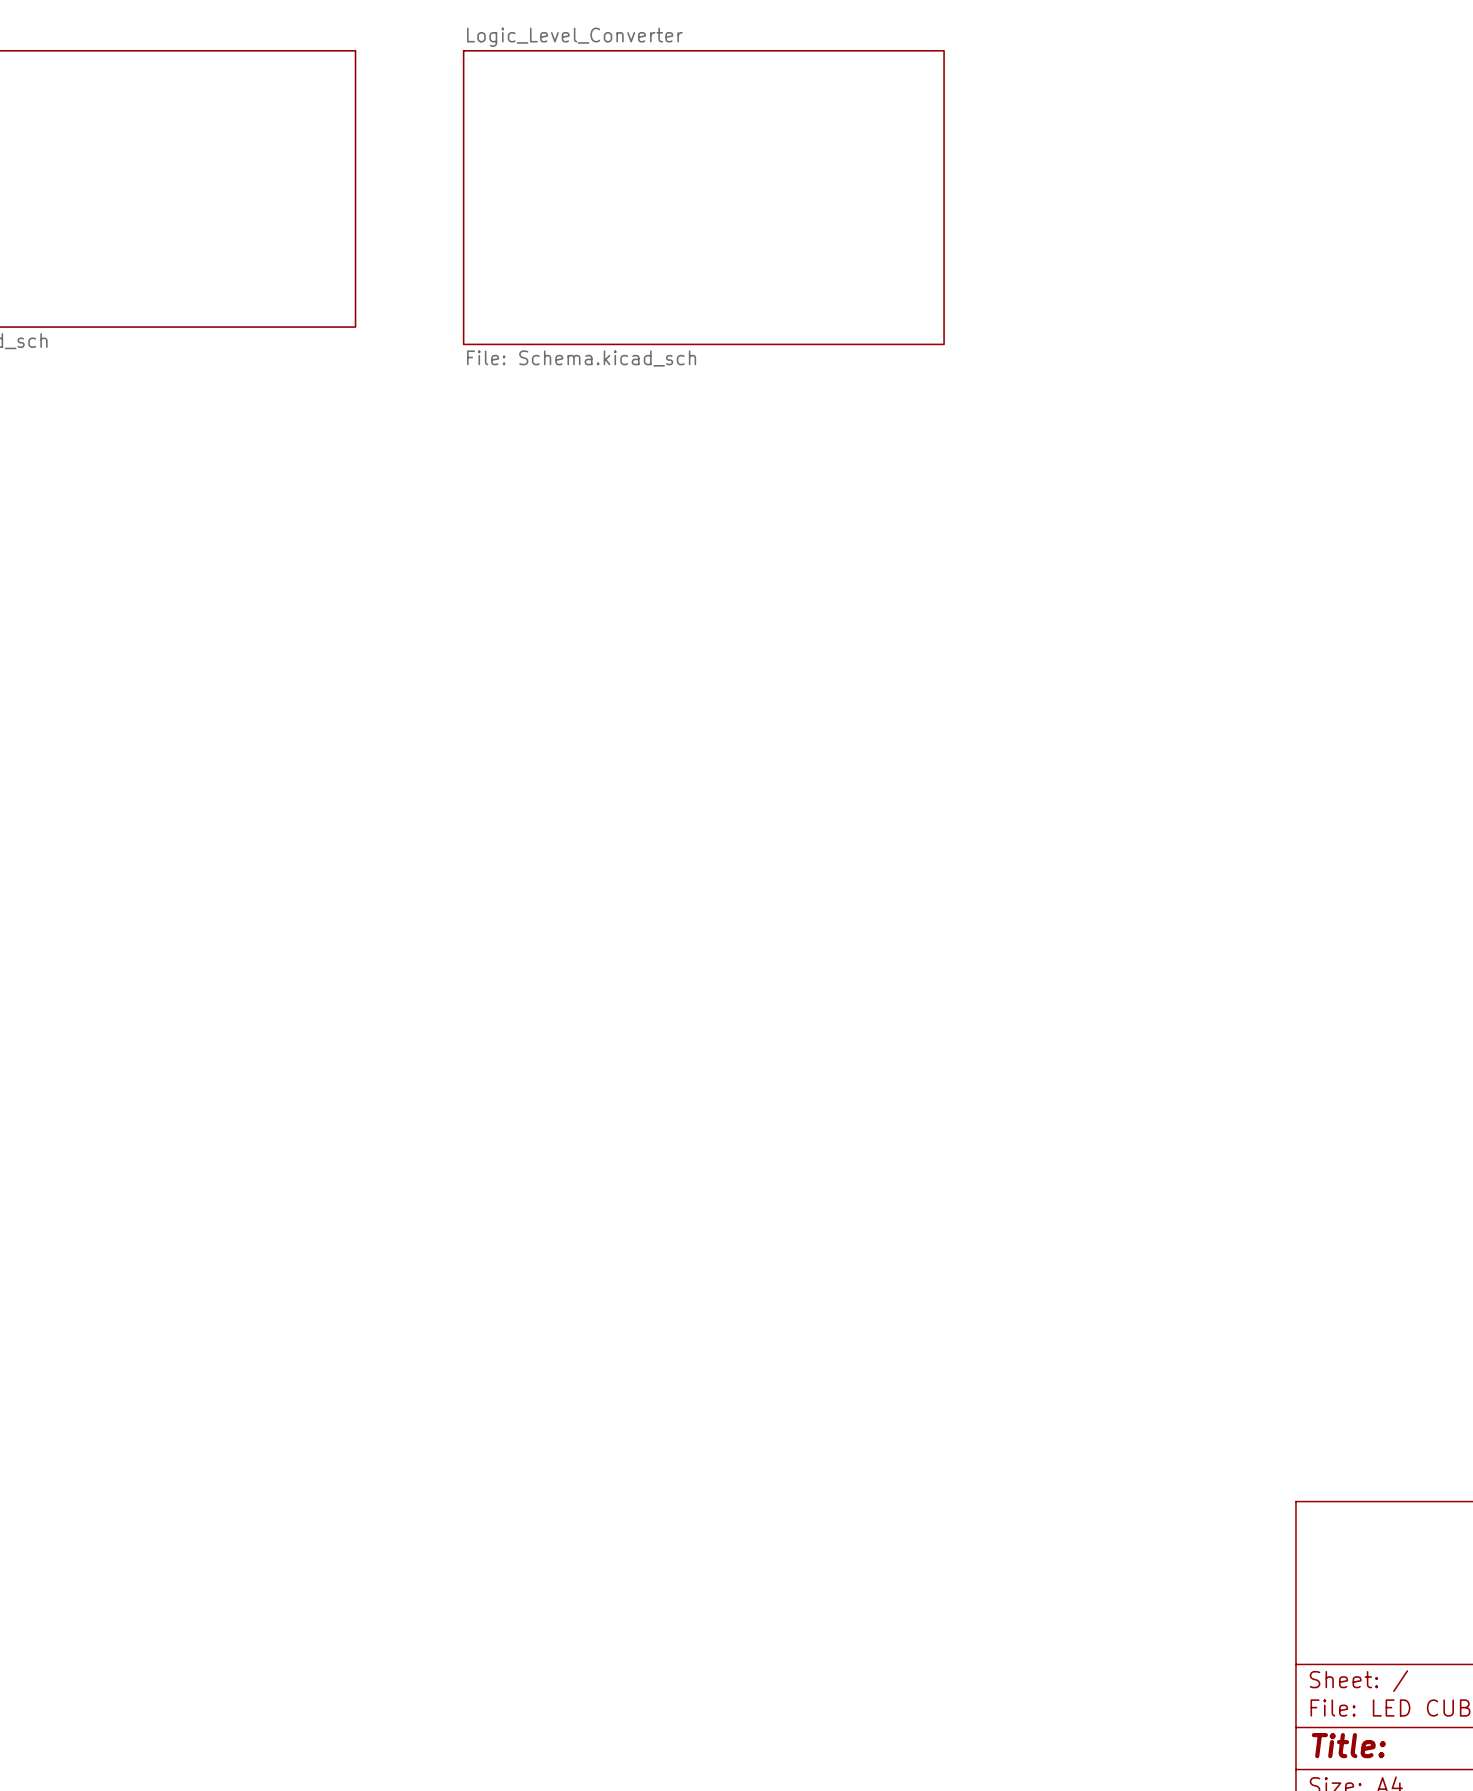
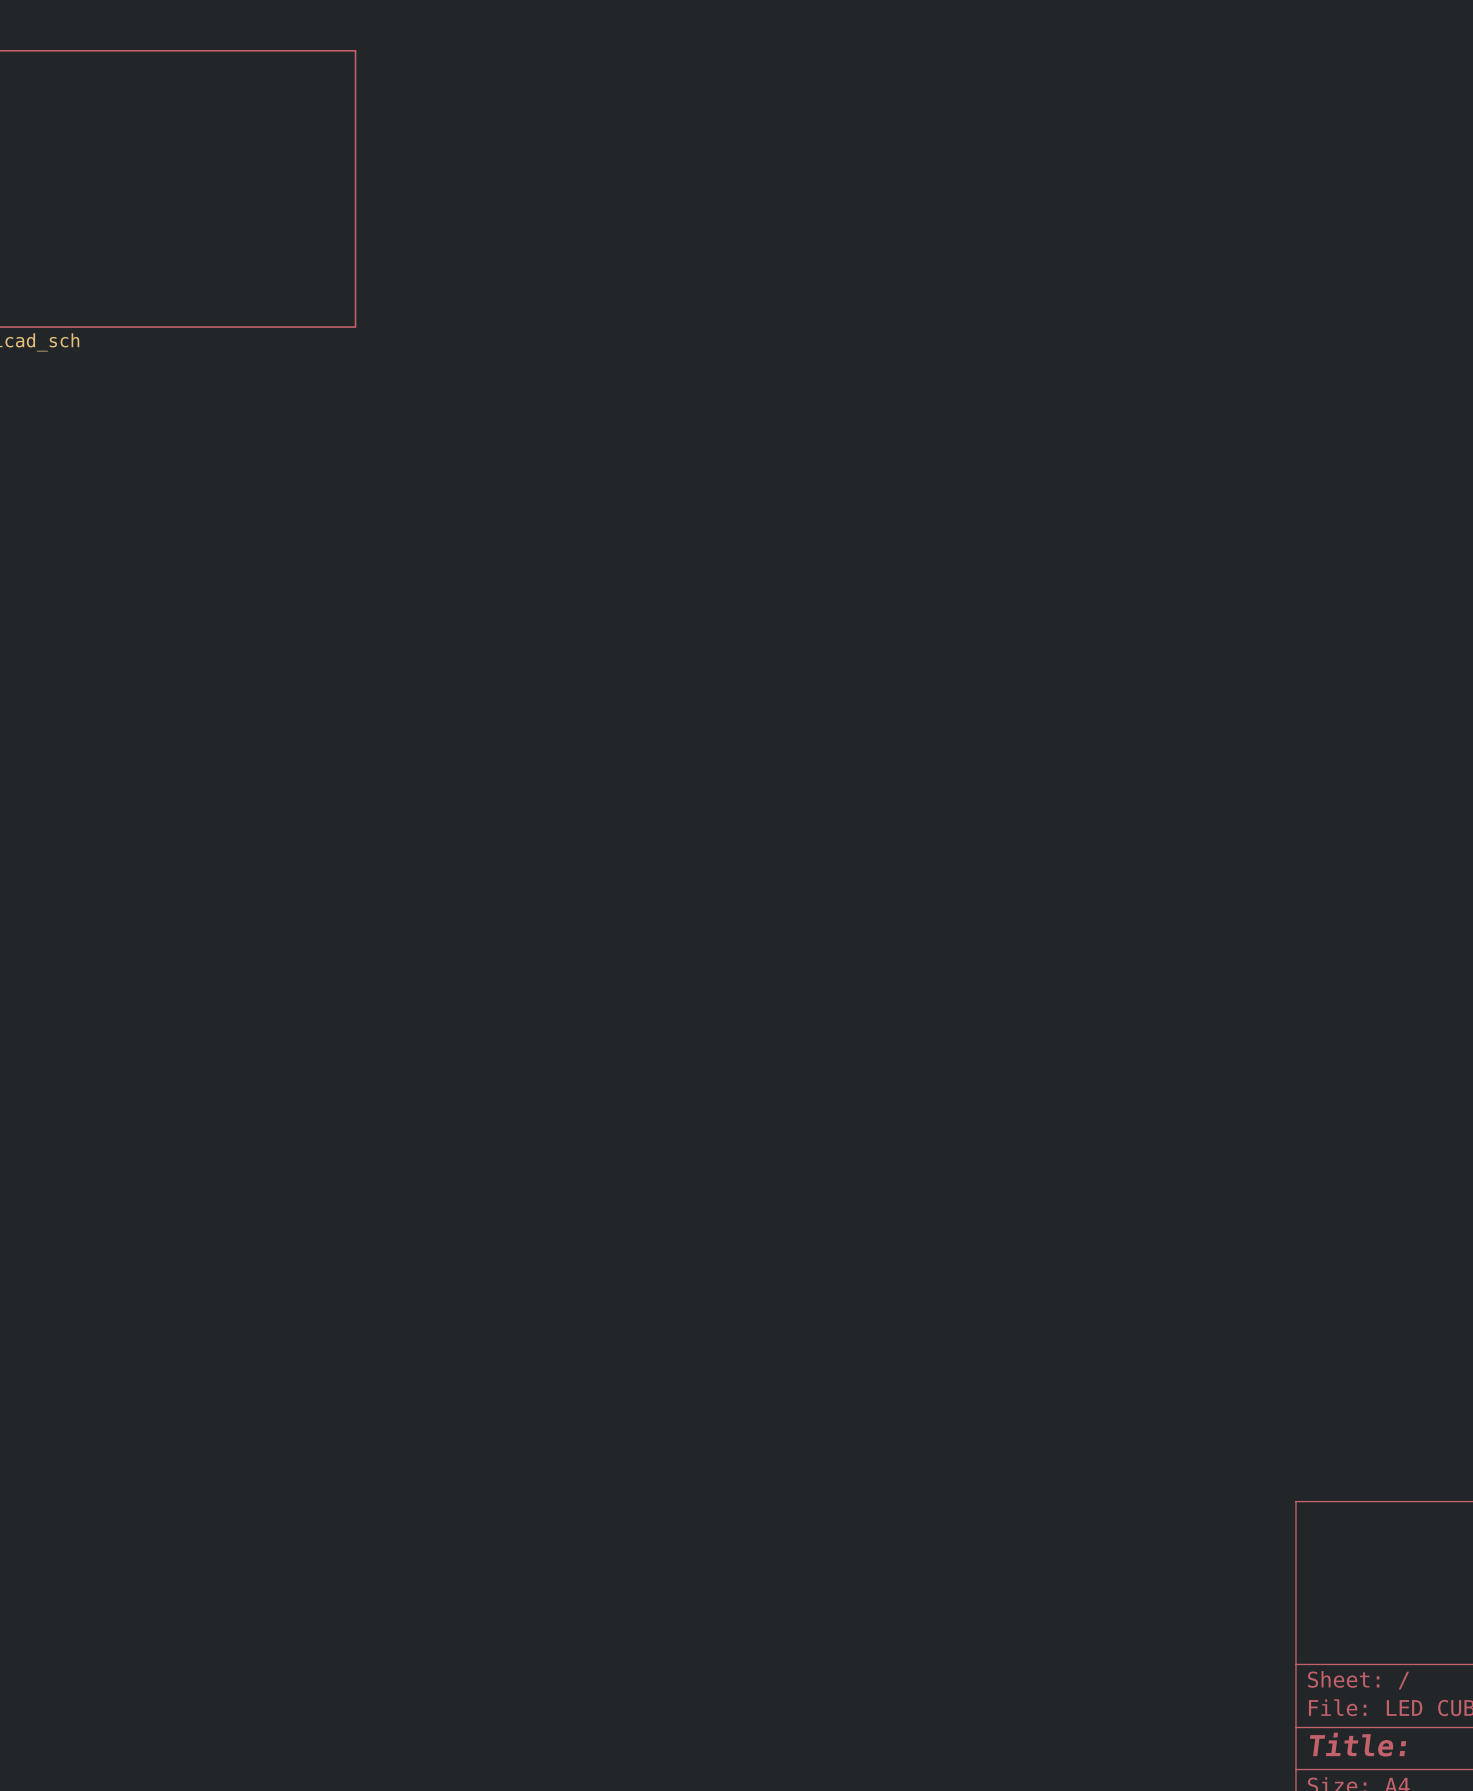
sheet Logic_Level_Converter: File: Schema.kicad_sch (703, 197) -> none

